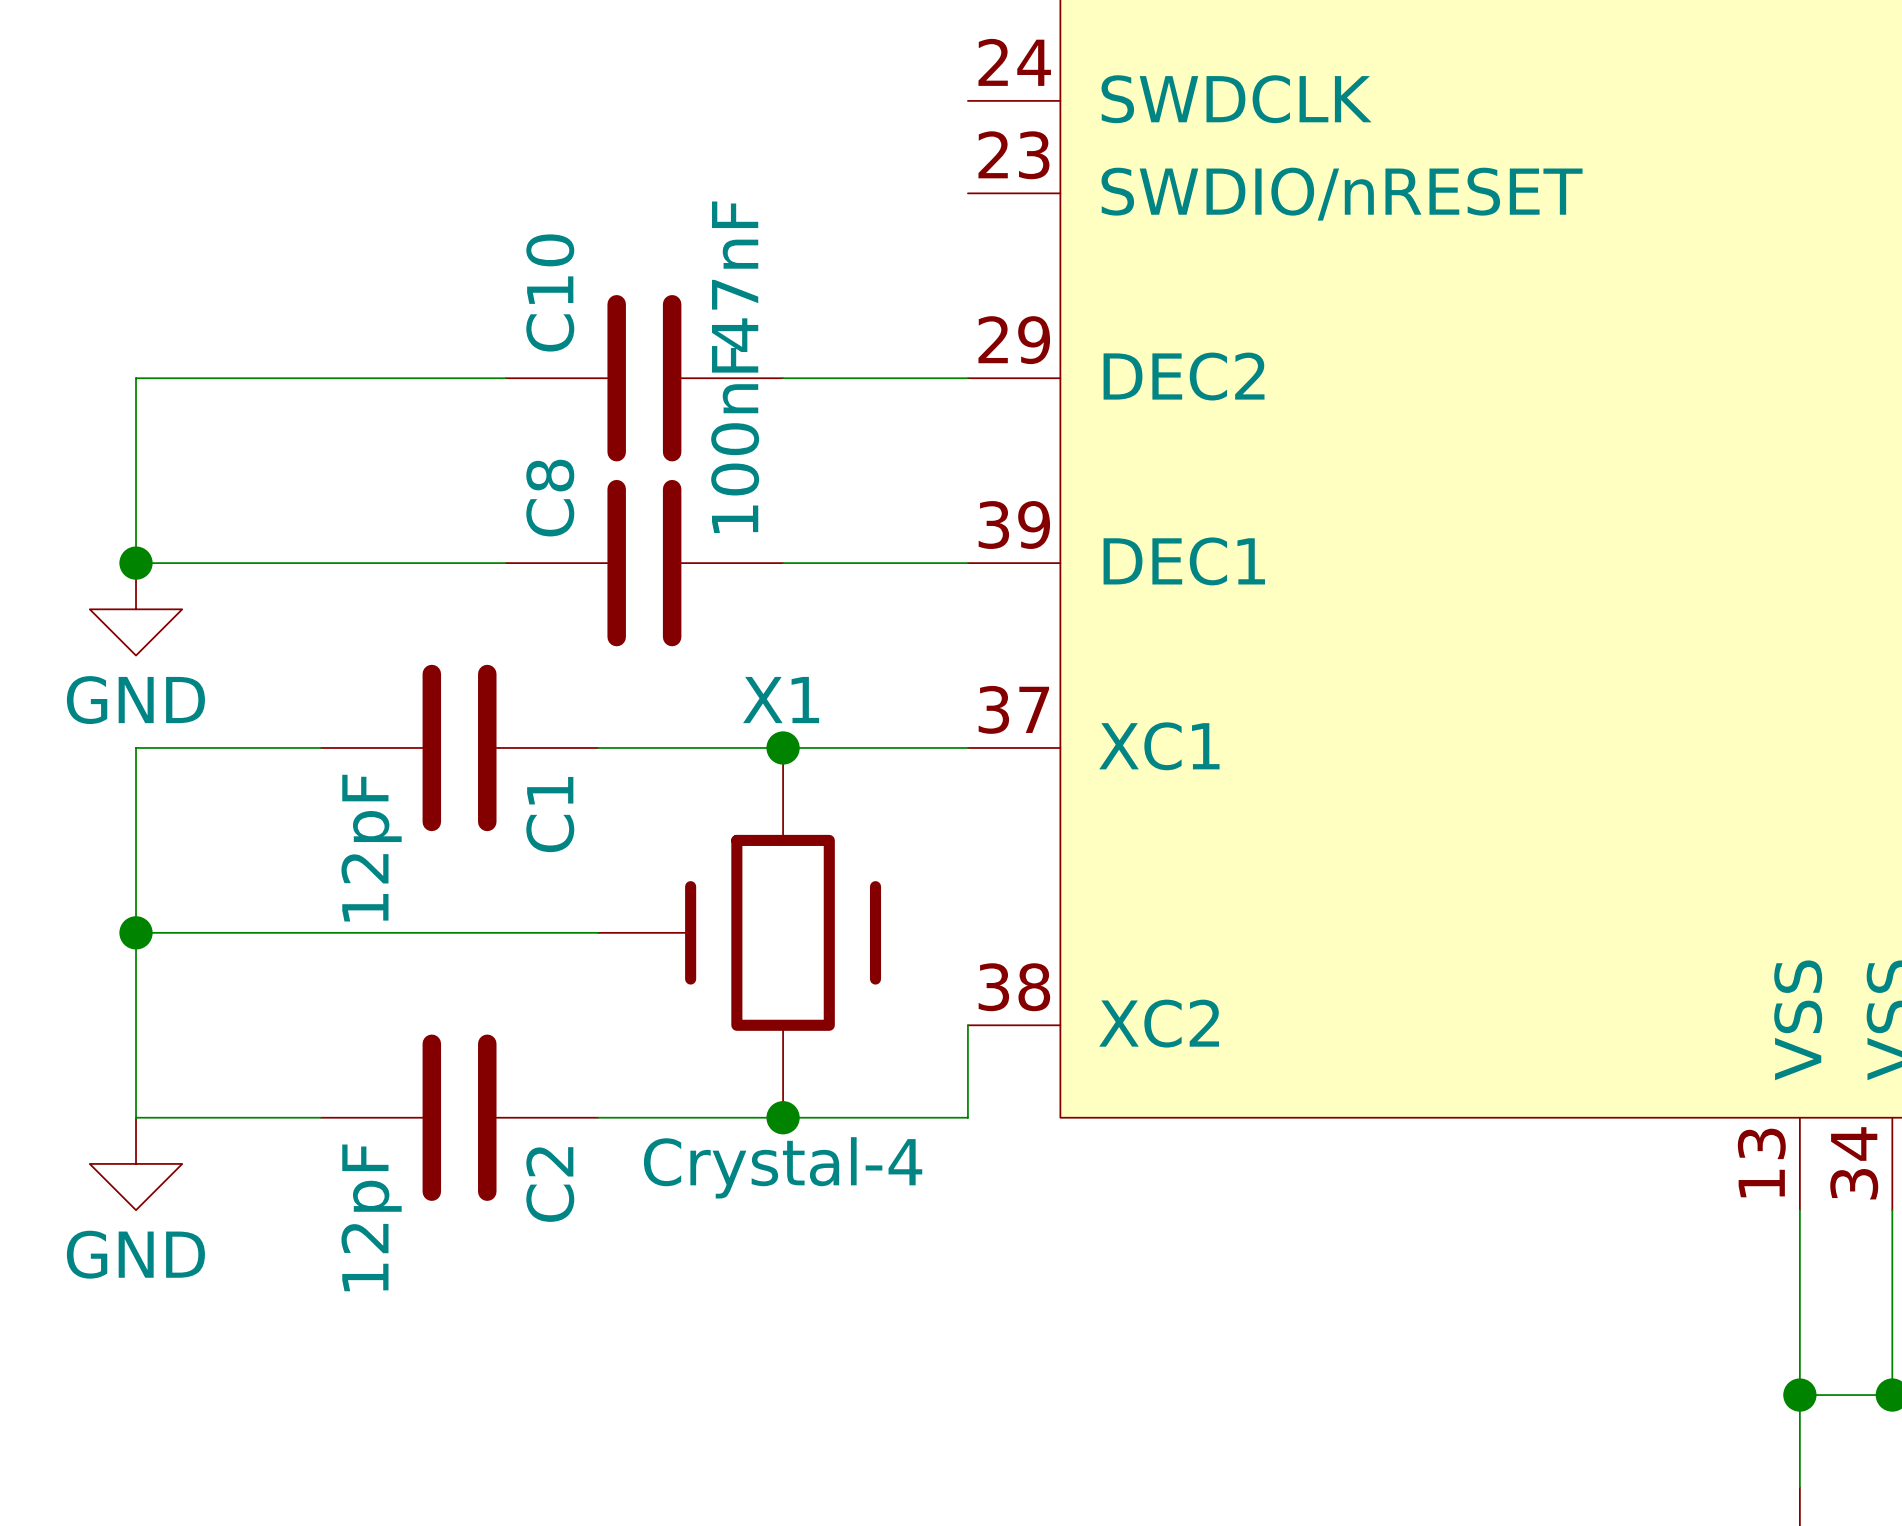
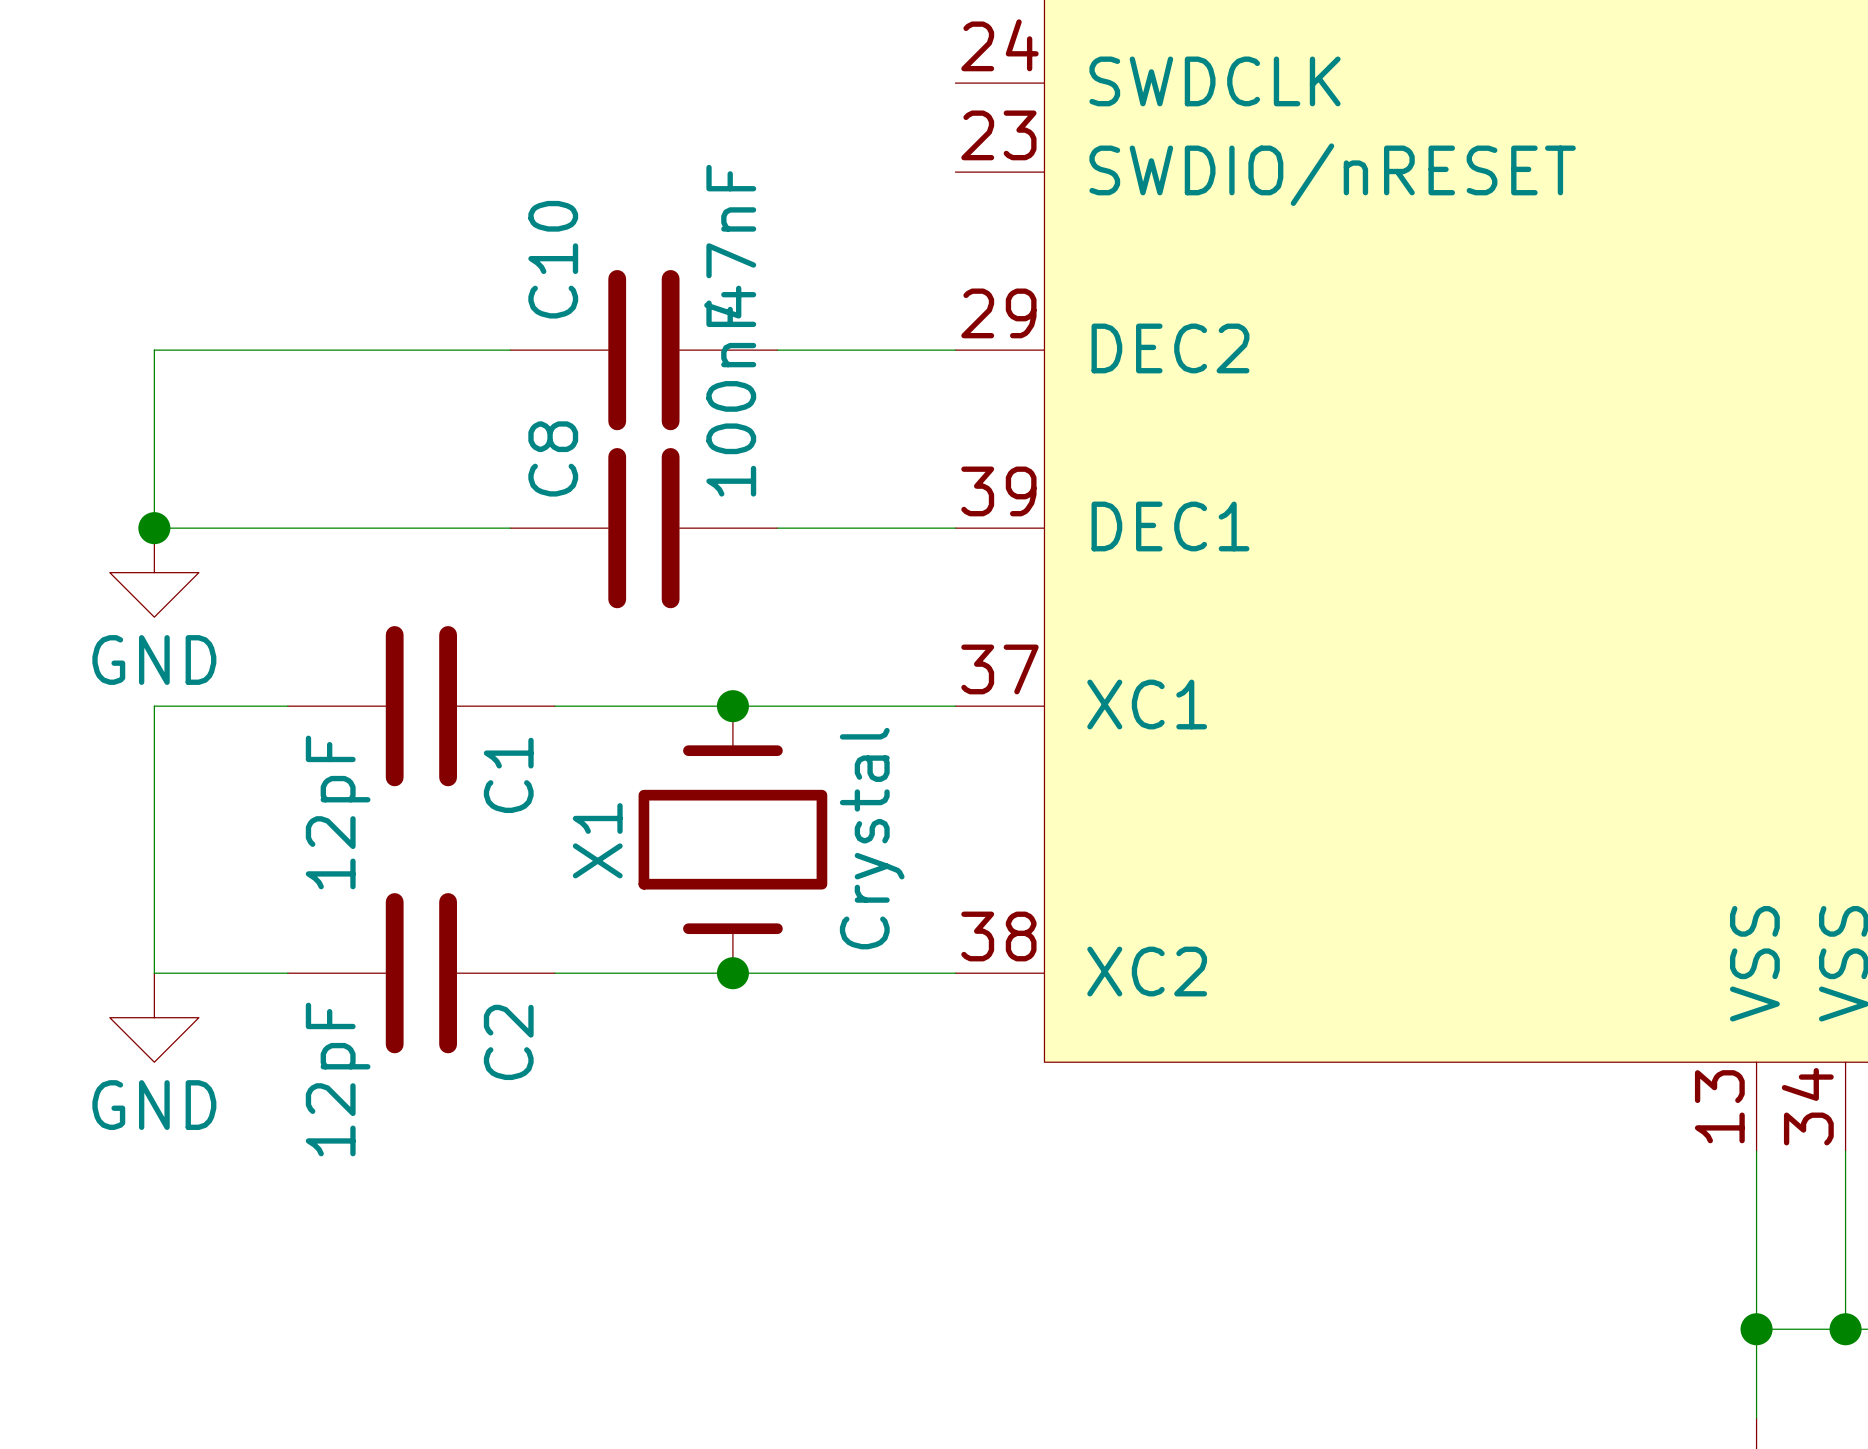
X1 name position: X1 (781, 700) -> X1 (597, 840)
C1 position: (459, 747) -> (421, 706)
X1 symbol: [598, 747, 882, 1118] -> [638, 706, 828, 974]
junction position: (783, 747) -> (732, 706)
wire: (136, 932) (598, 932) -> none
junction: (136, 932) -> none
wire: (136, 1025) (136, 1117) (320, 1117) -> (154, 973) (287, 973)
wire: (967, 1025) (967, 1117) (598, 1117) -> (955, 973) (554, 973)
C2 position: (459, 1117) -> (421, 973)
junction position: (783, 1117) -> (732, 973)
power symbol position: GND (136, 1163) -> GND (154, 1017)
X1 value: Crystal-4 (783, 1167) -> Crystal (872, 838)

